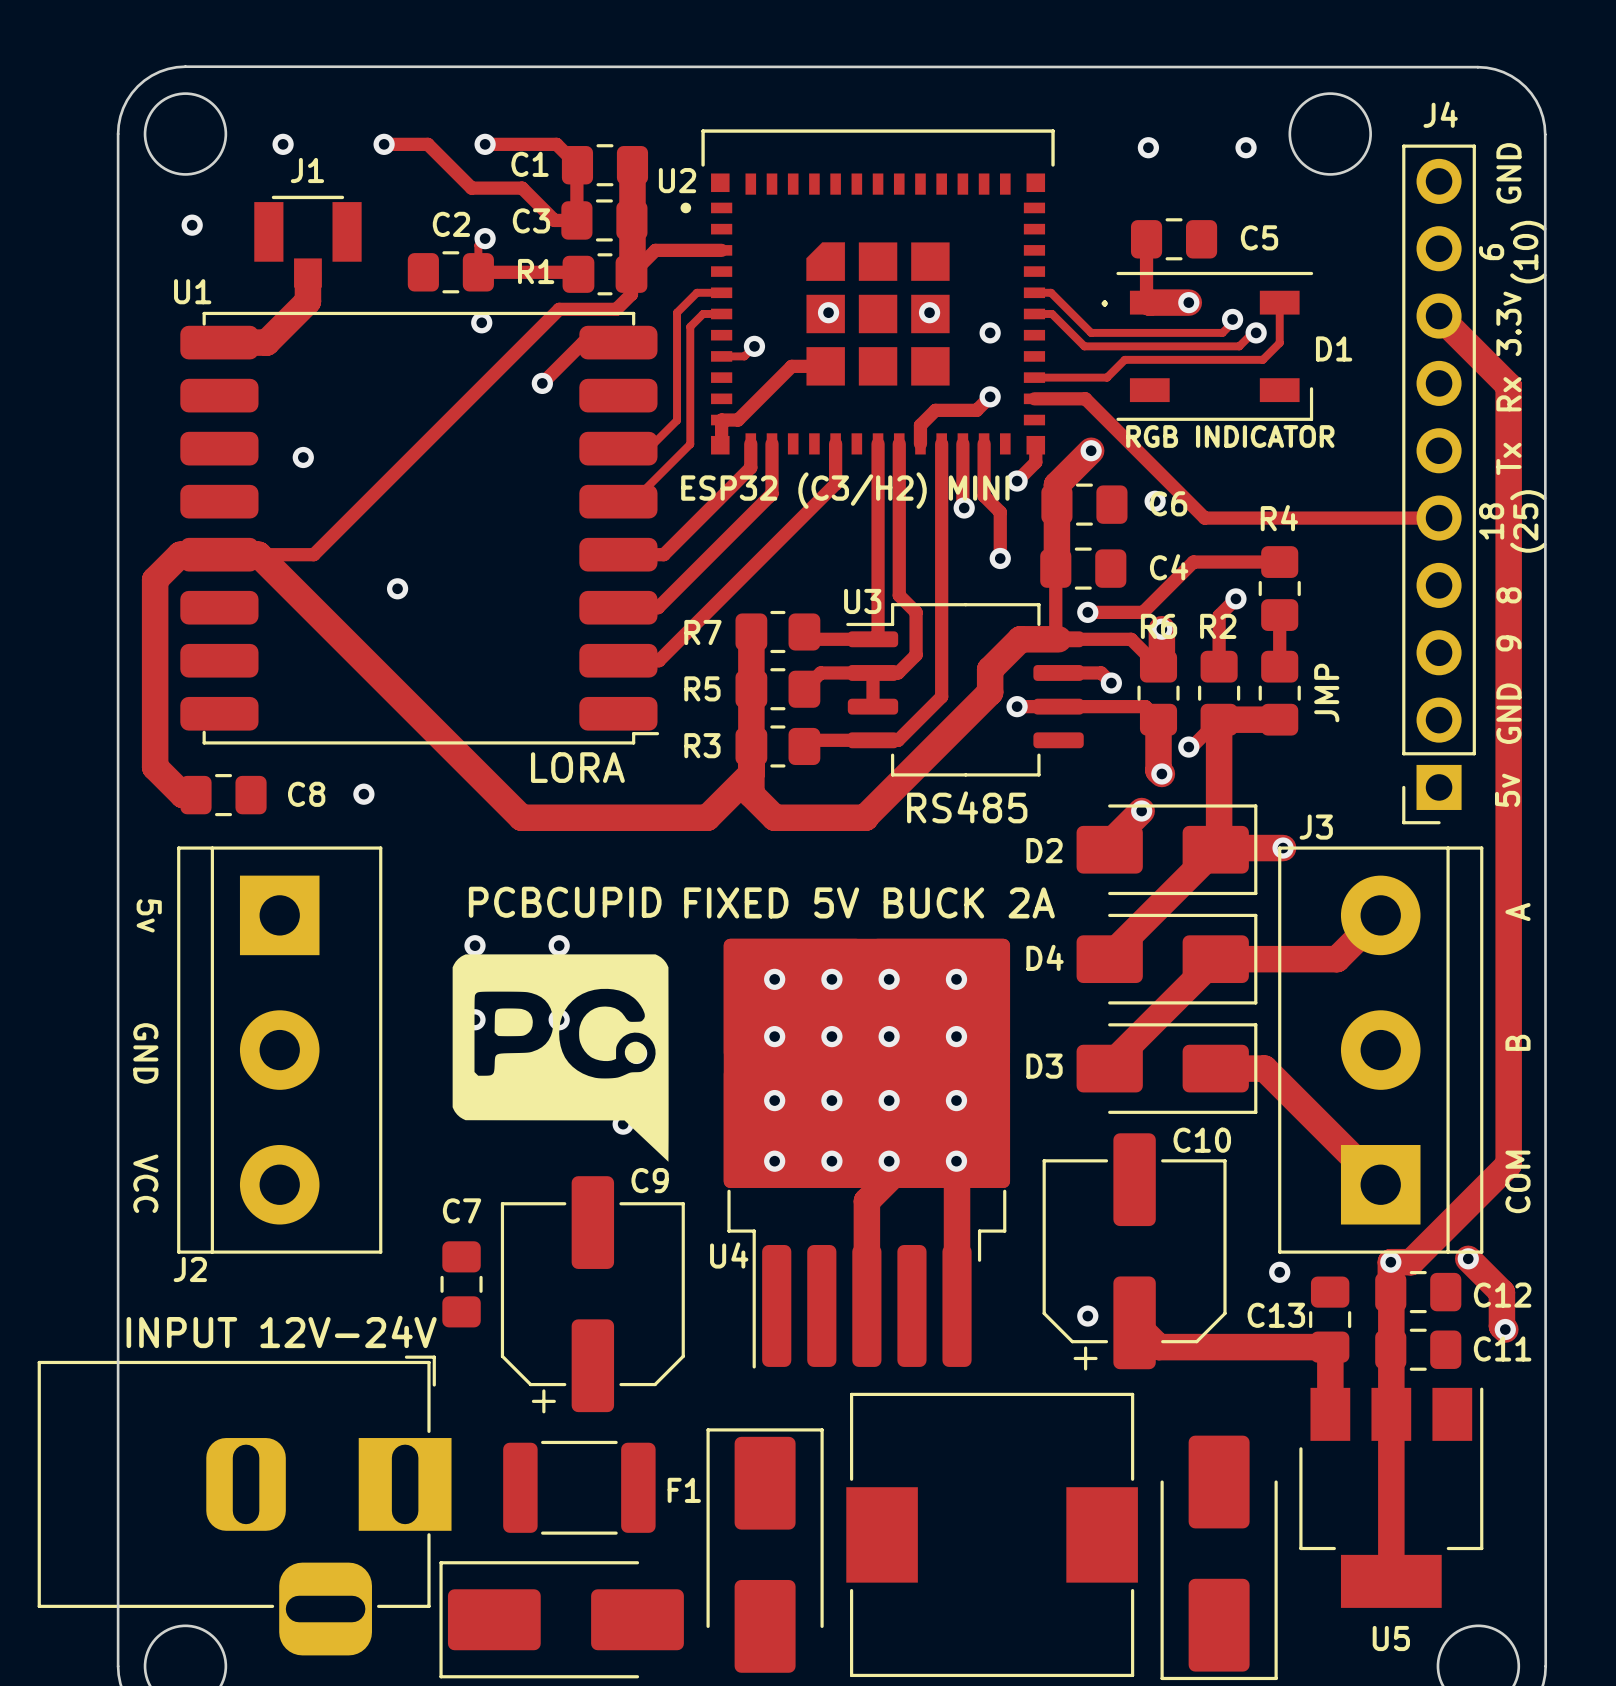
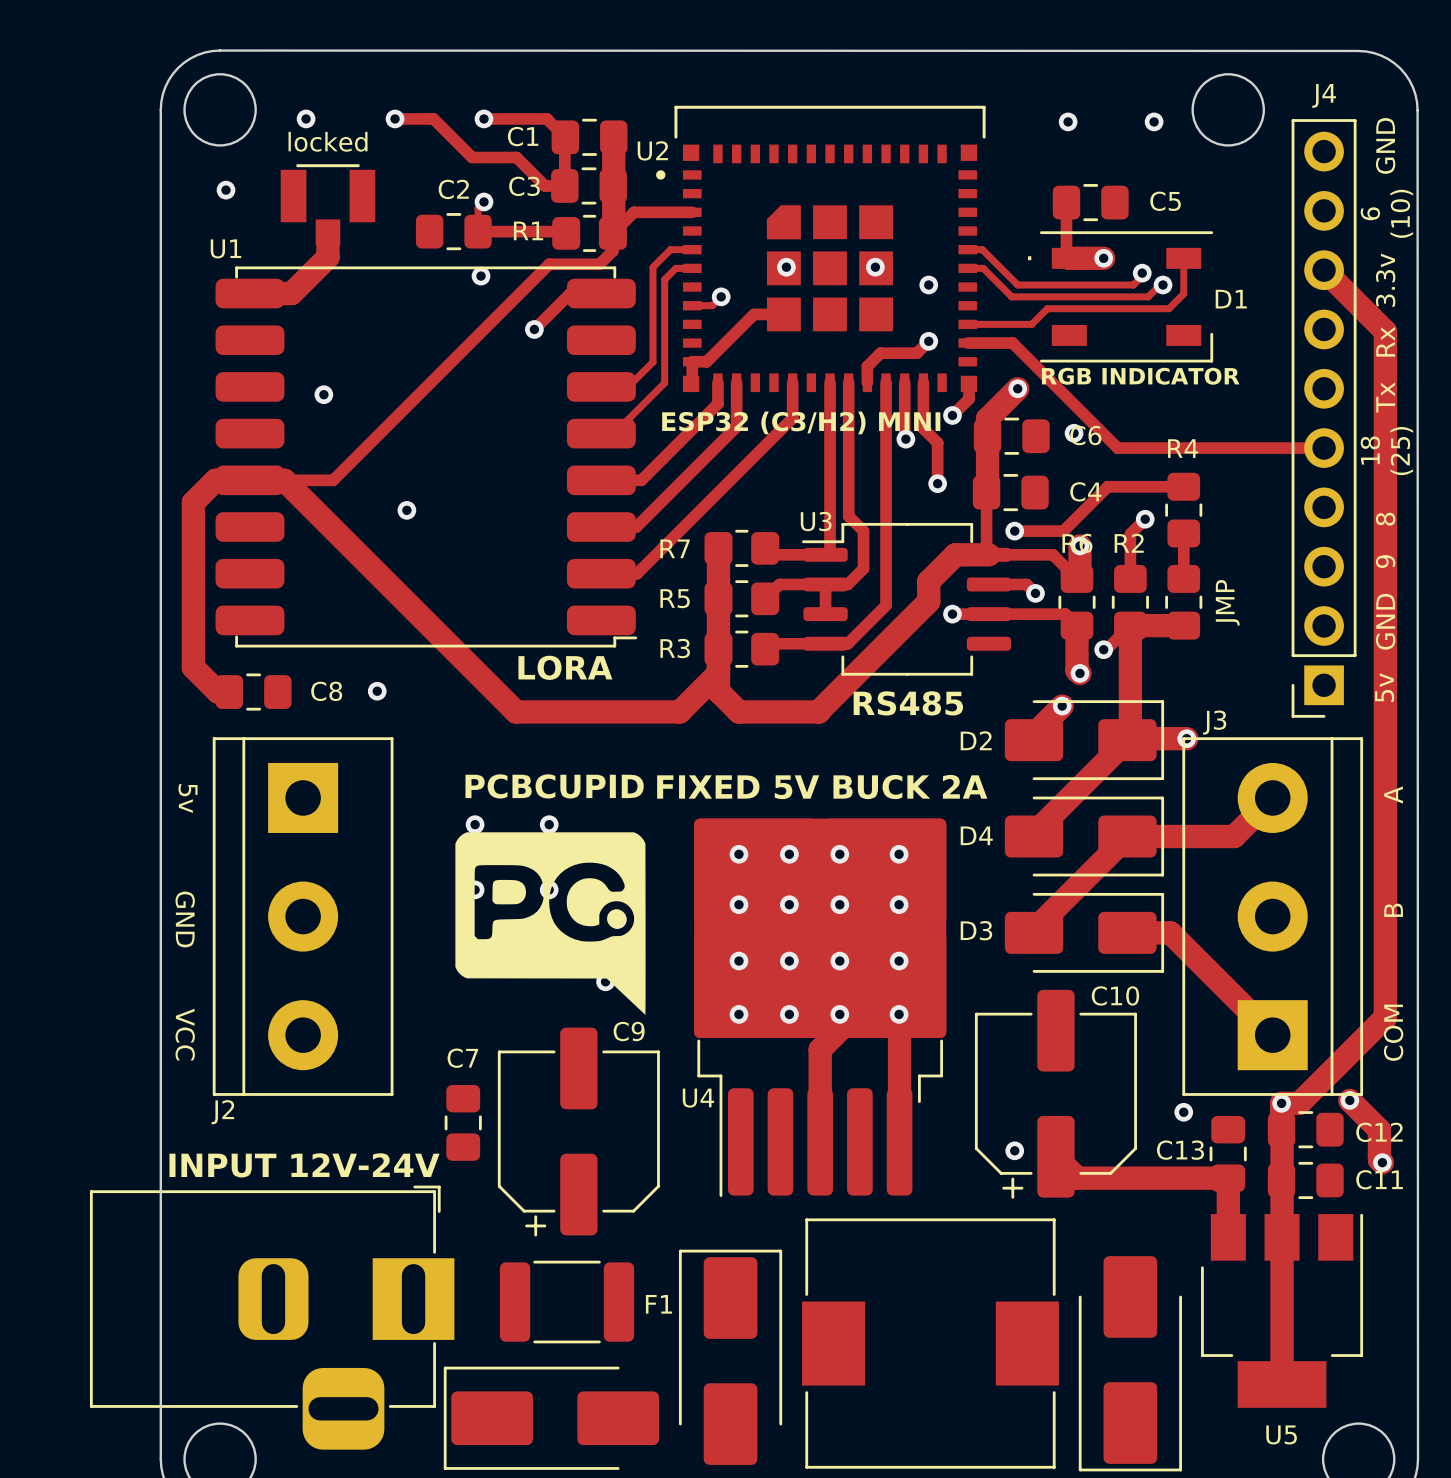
J1 name: J1 (307, 170) -> locked (328, 141)

